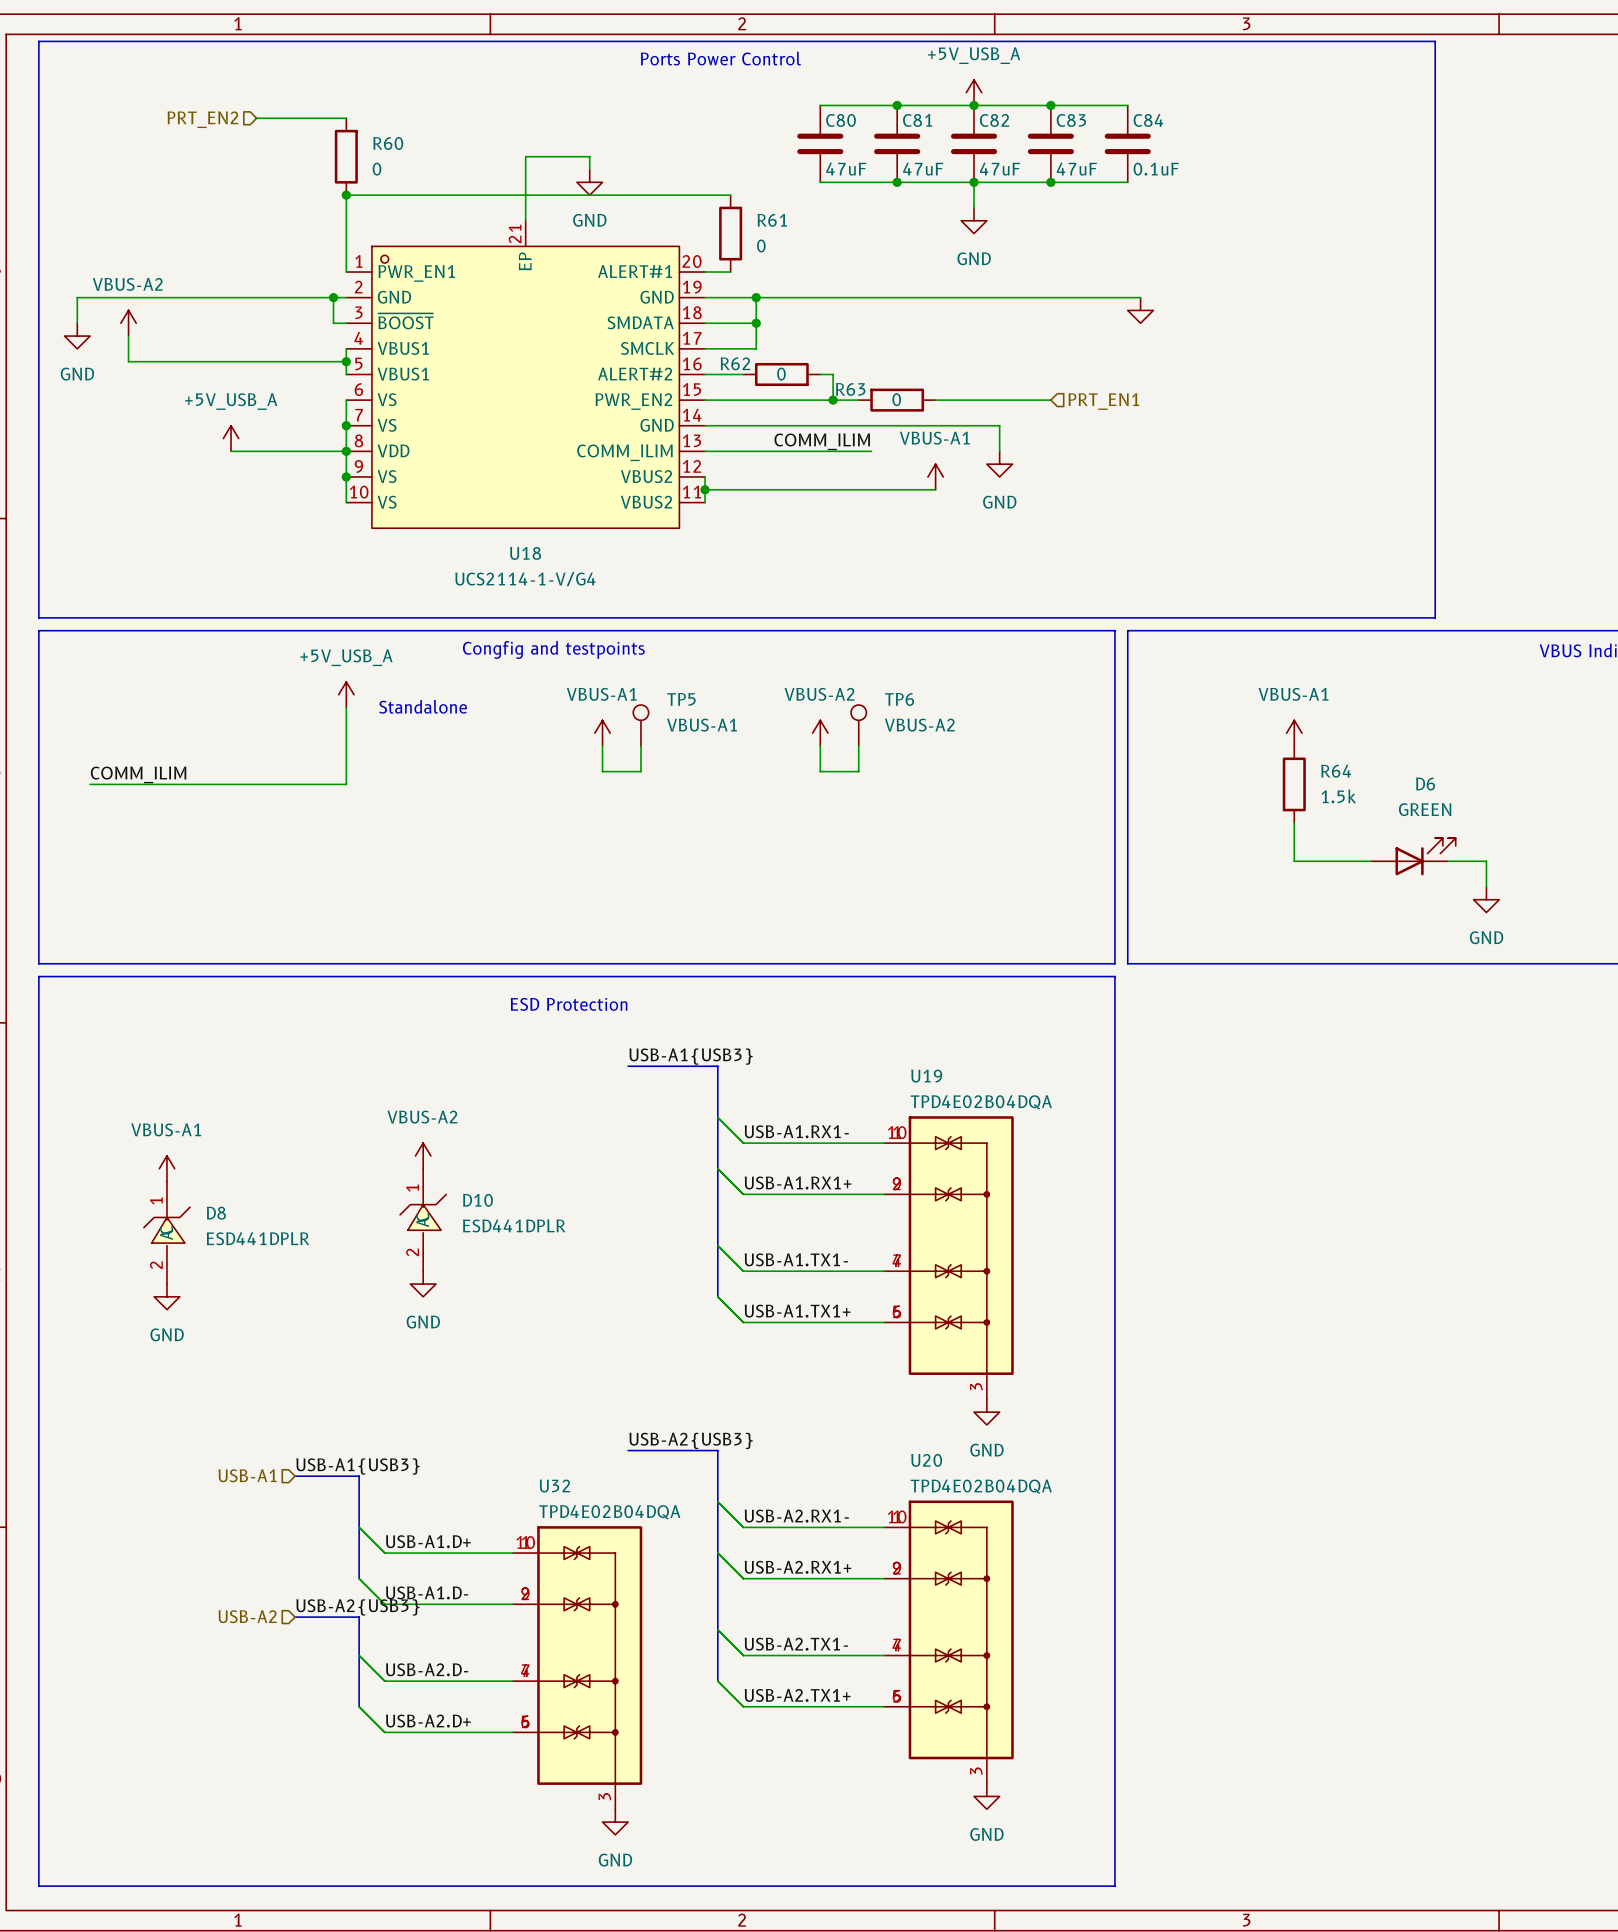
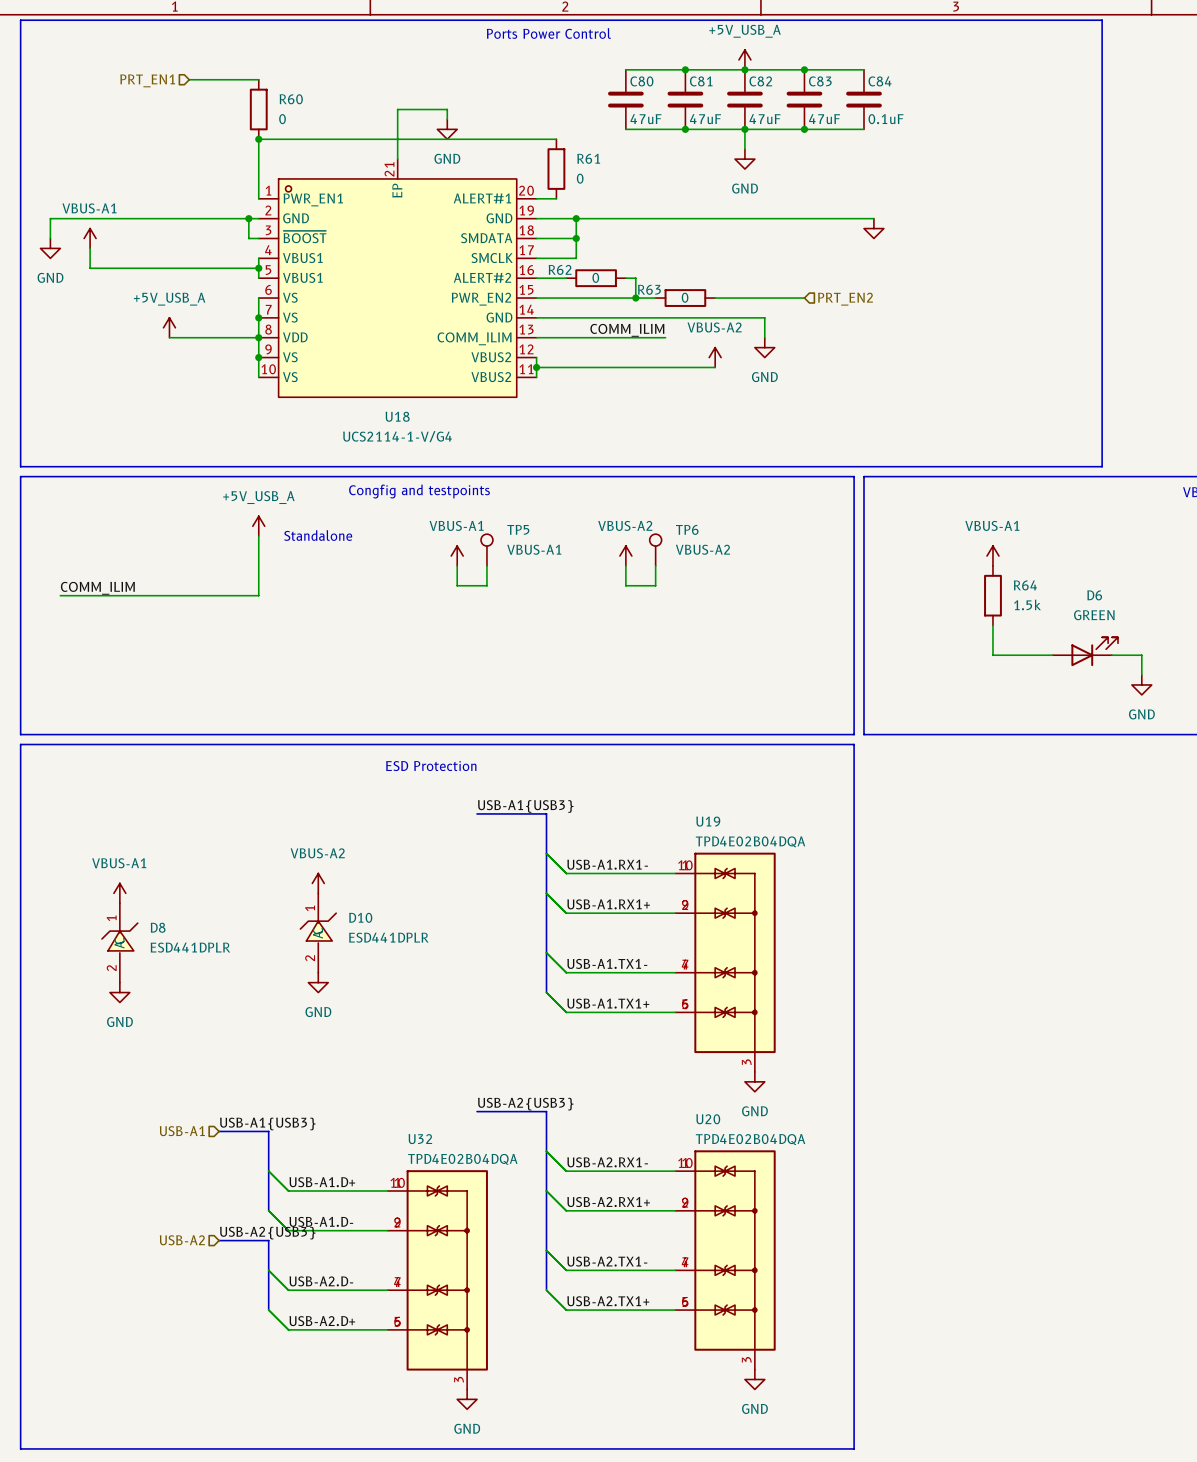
hierarchical label: PRT_EN2 (202, 119) -> PRT_EN1 (147, 80)
power symbol: VBUS-A2 (128, 323) -> VBUS-A1 (90, 238)
hierarchical label: PRT_EN1 (1103, 401) -> PRT_EN2 (845, 299)
power symbol: VBUS-A1 (935, 476) -> VBUS-A2 (715, 357)

